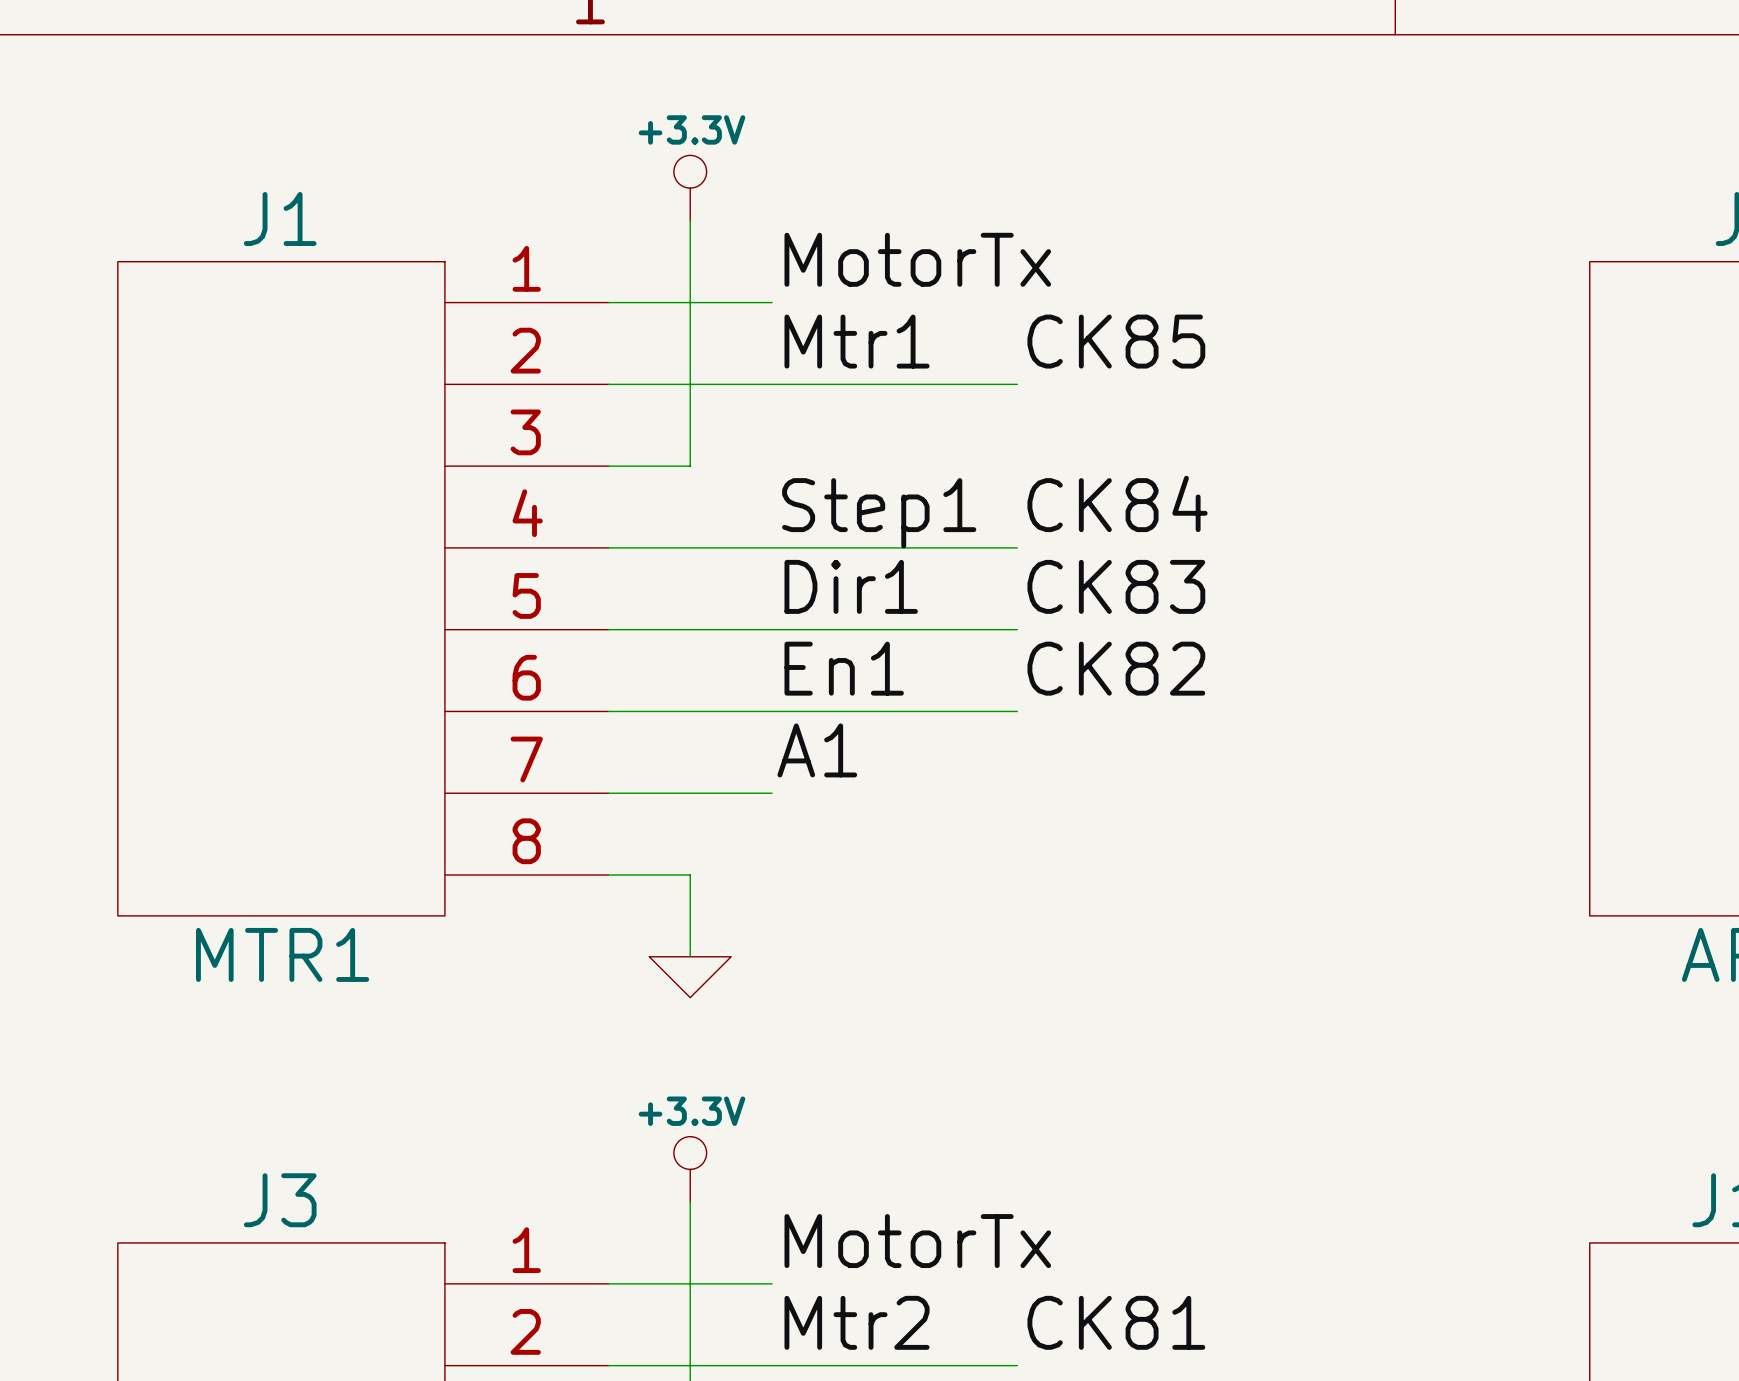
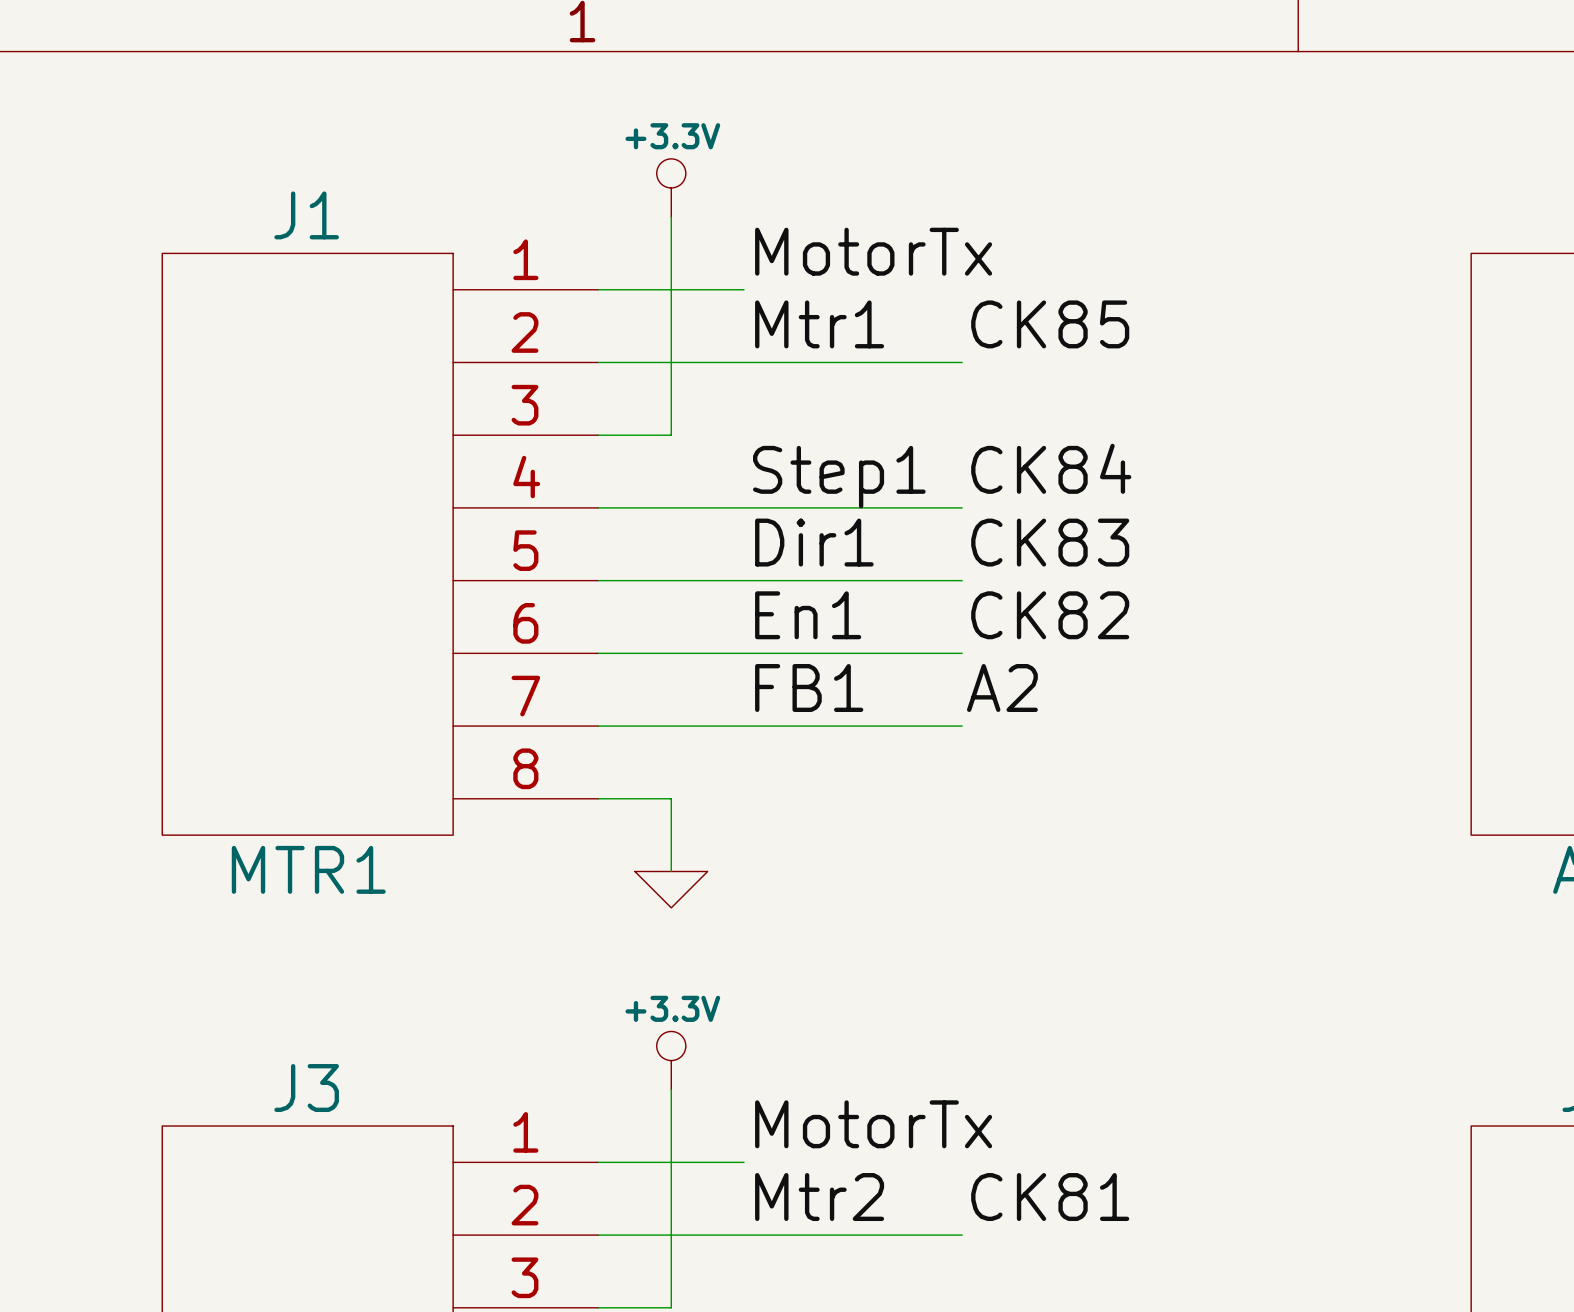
label: A1 (817, 750) -> FB1 (809, 688)
label: none -> A2 (1002, 688)
wire: none -> (744, 726) (962, 726)

